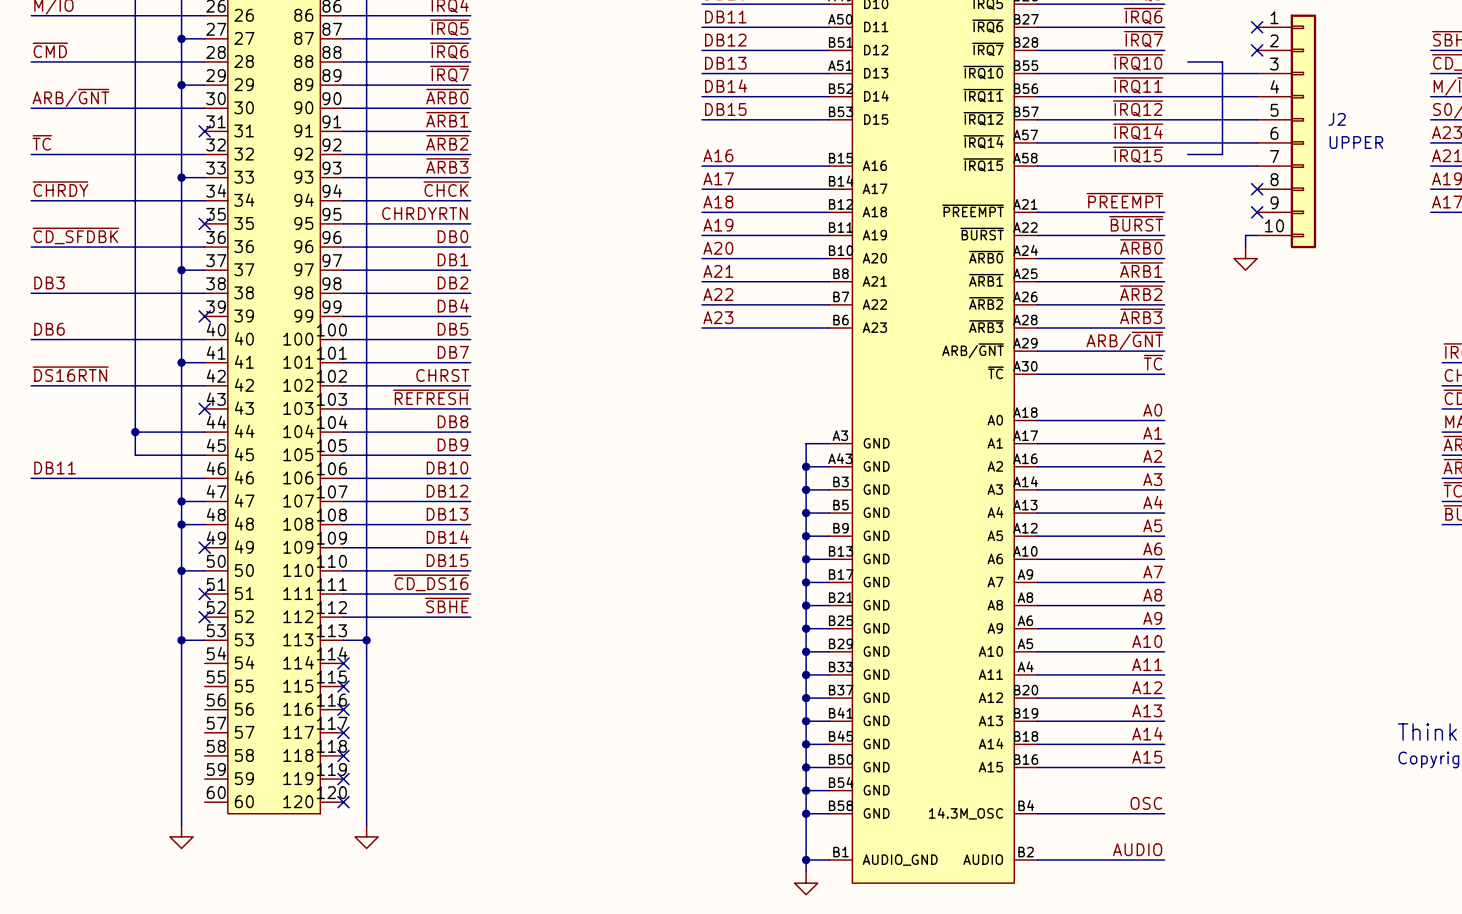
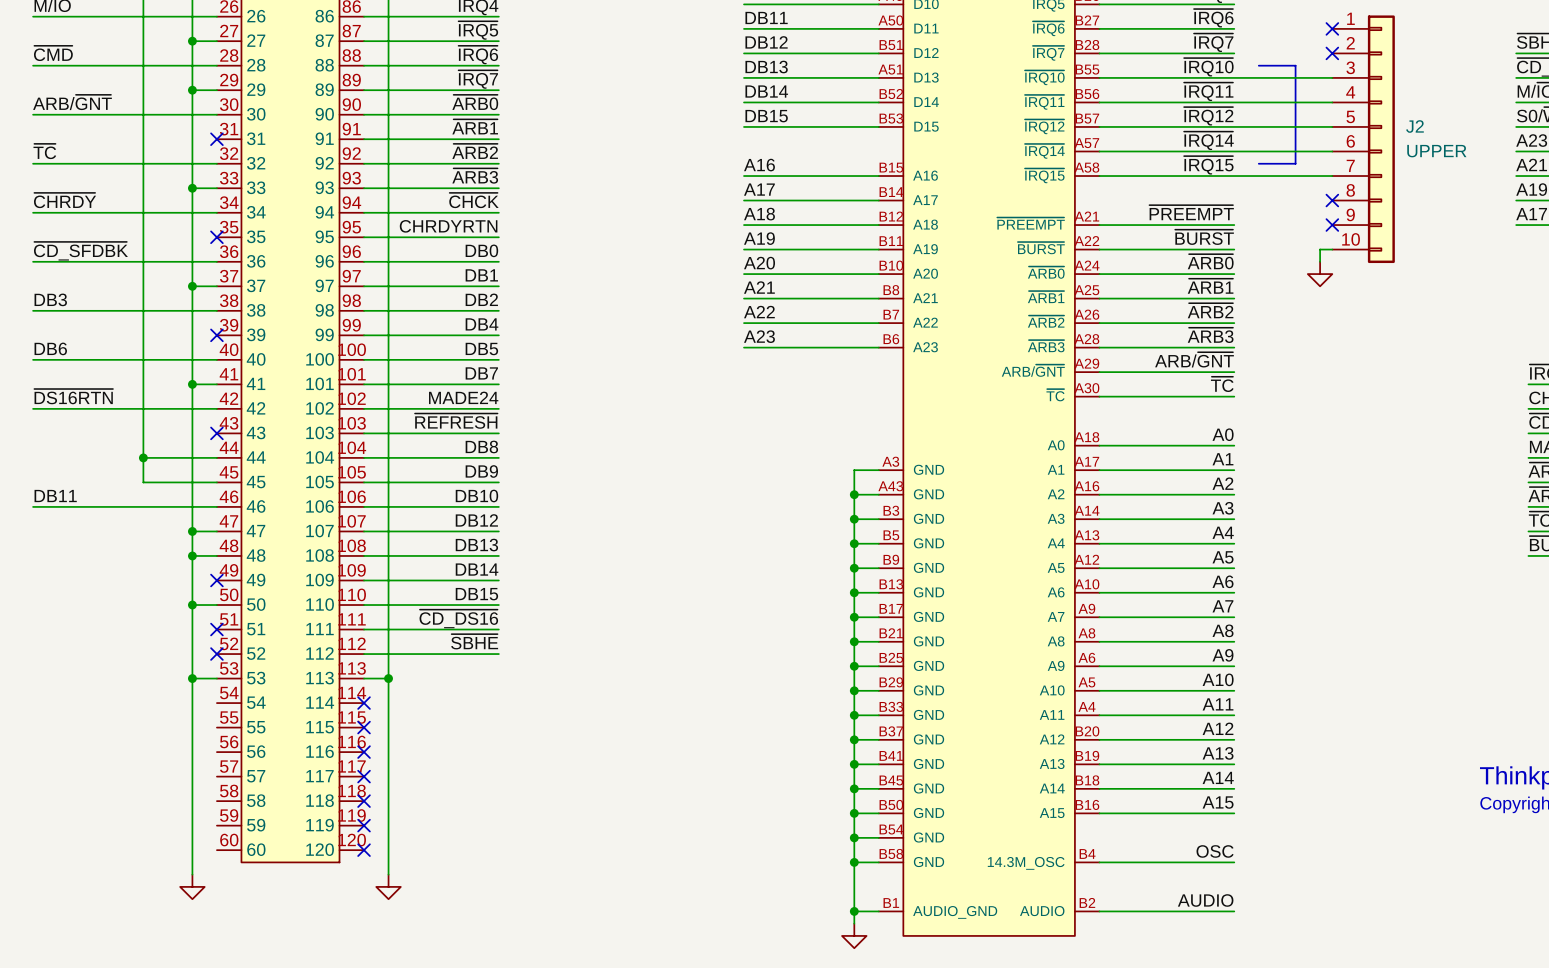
label: CHRST (442, 375) -> MADE24 (463, 397)

